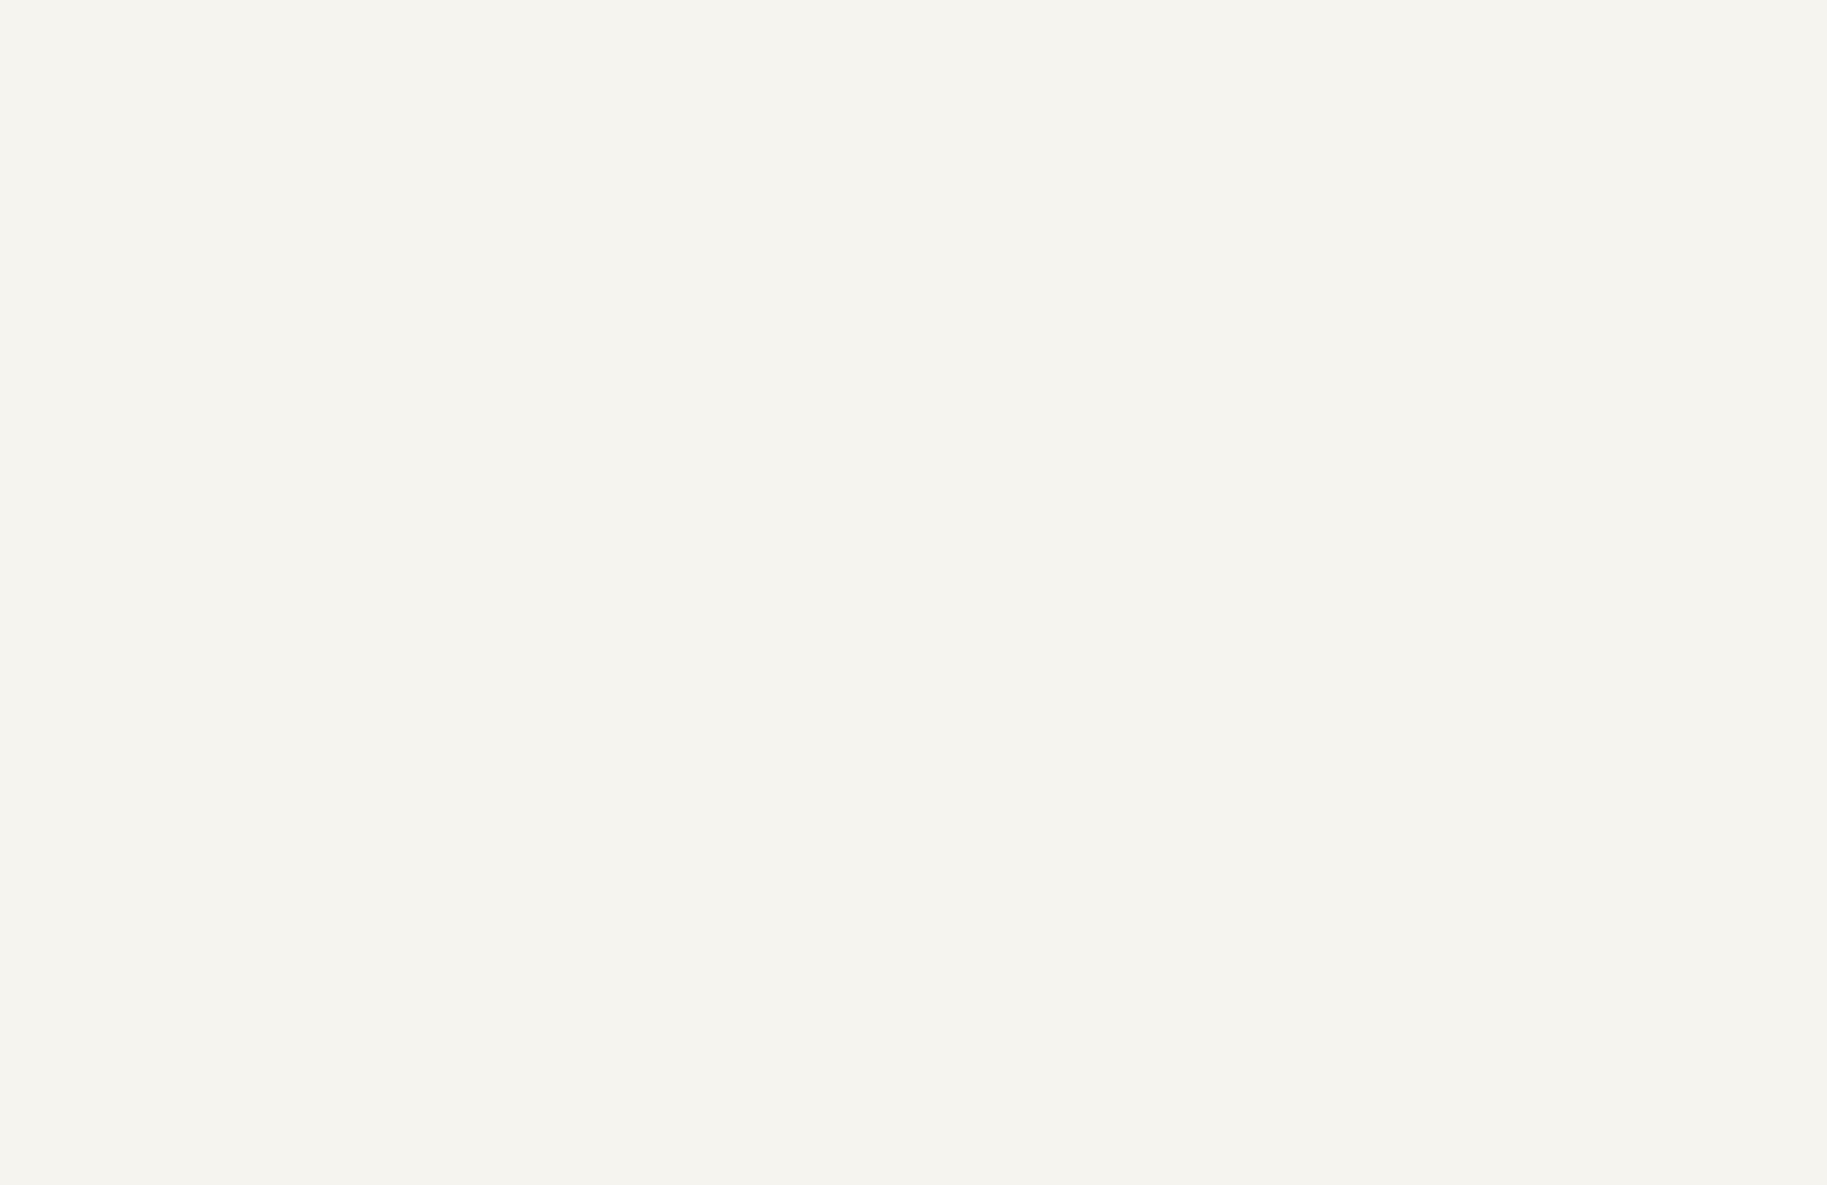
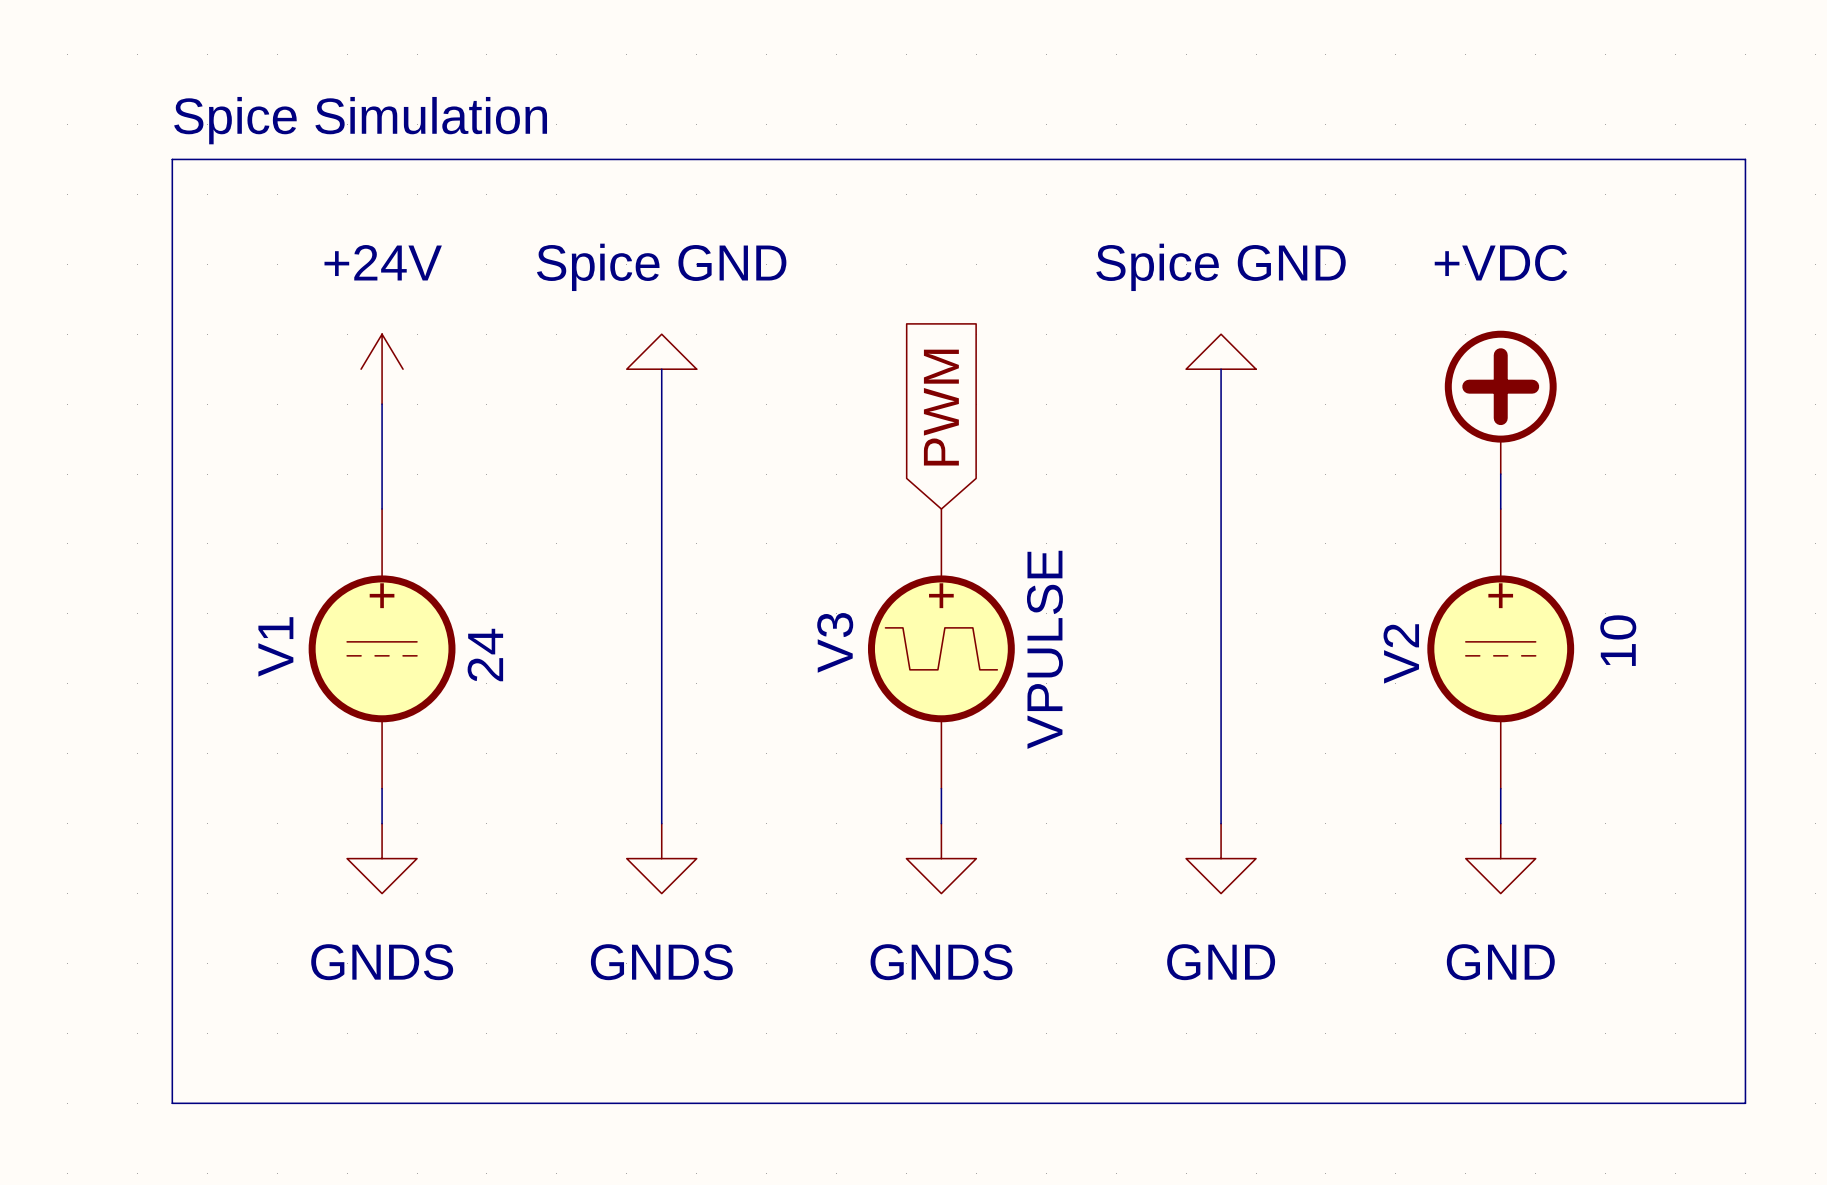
text: none -> Spice Simulation (360, 120)
line: none -> (172, 159) (1745, 159) (1745, 1103) (172, 1103) (172, 159)
power symbol: none -> Spice GND (661, 351)
power symbol: none -> Spice GND (1221, 351)
power symbol: none -> +24V (382, 369)
wire: none -> (661, 369) (661, 823)
wire: none -> (1221, 369) (1221, 823)
power symbol: none -> +VDC (1500, 402)
wire: none -> (382, 404) (382, 509)
global label: none -> PWM (941, 407)
wire: none -> (1500, 474) (1500, 509)
V1: none -> 24 (382, 648)
V3: none -> VPULSE (941, 648)
V2: none -> 10 (1500, 648)
wire: none -> (382, 788) (382, 823)
wire: none -> (941, 788) (941, 823)
wire: none -> (1500, 788) (1500, 823)
power symbol: none -> GNDS (382, 858)
power symbol: none -> GNDS (661, 858)
power symbol: none -> GNDS (941, 858)
power symbol: none -> GND (1221, 858)
power symbol: none -> GND (1500, 858)

